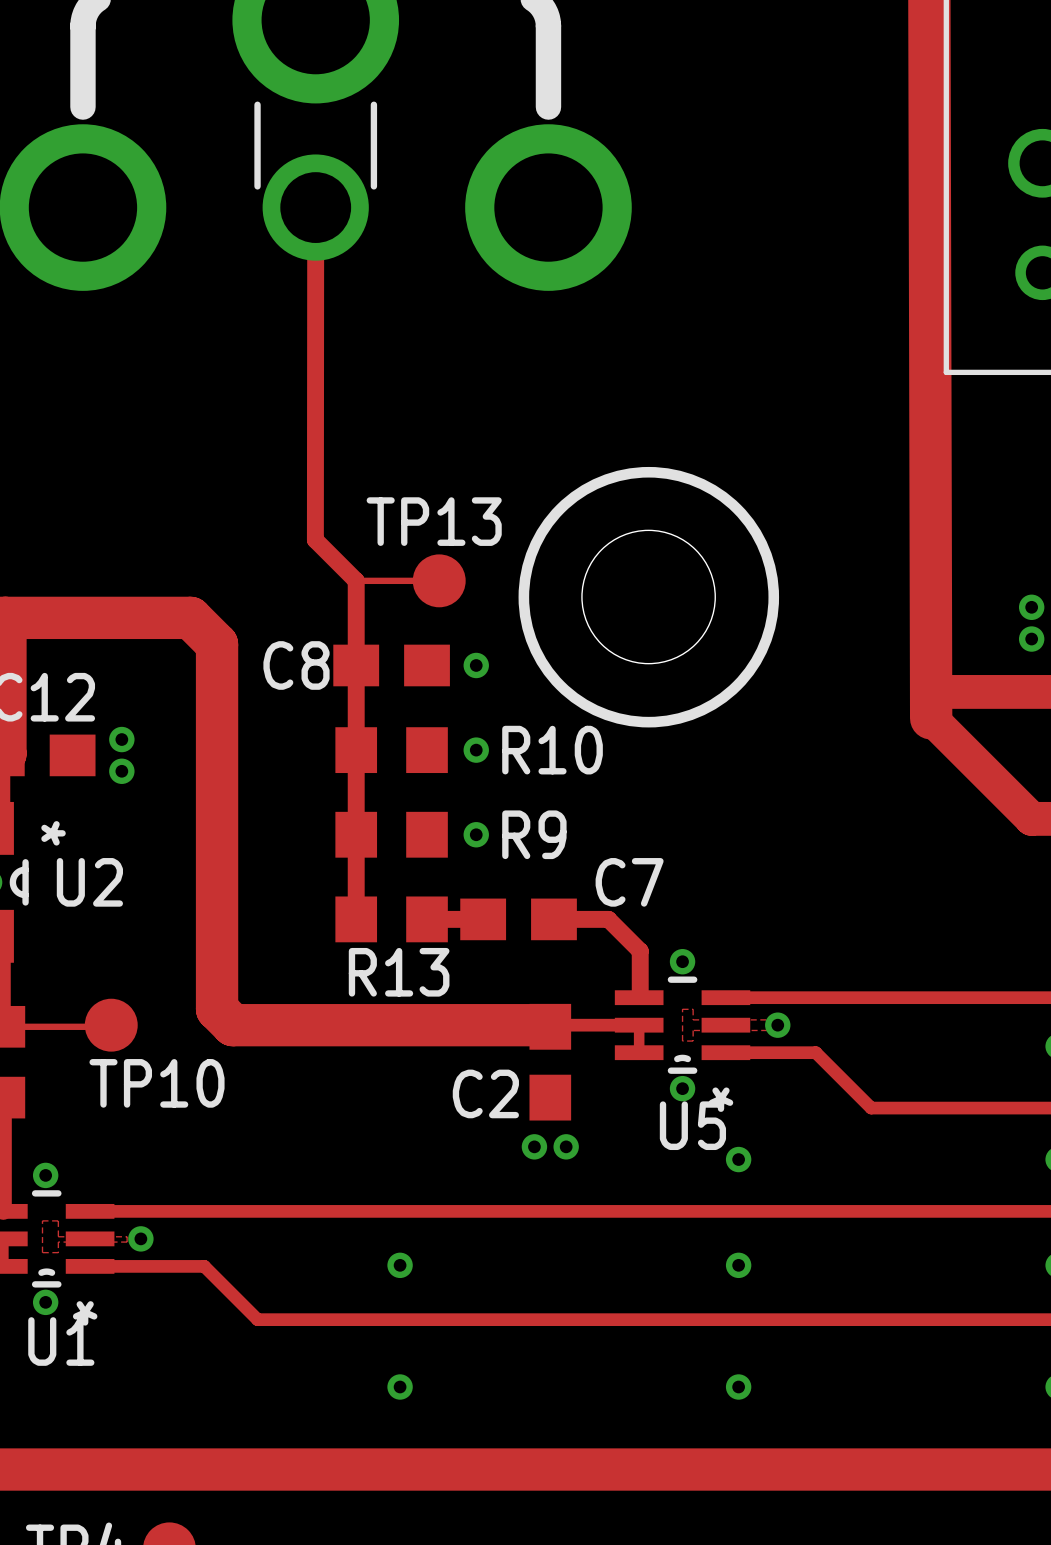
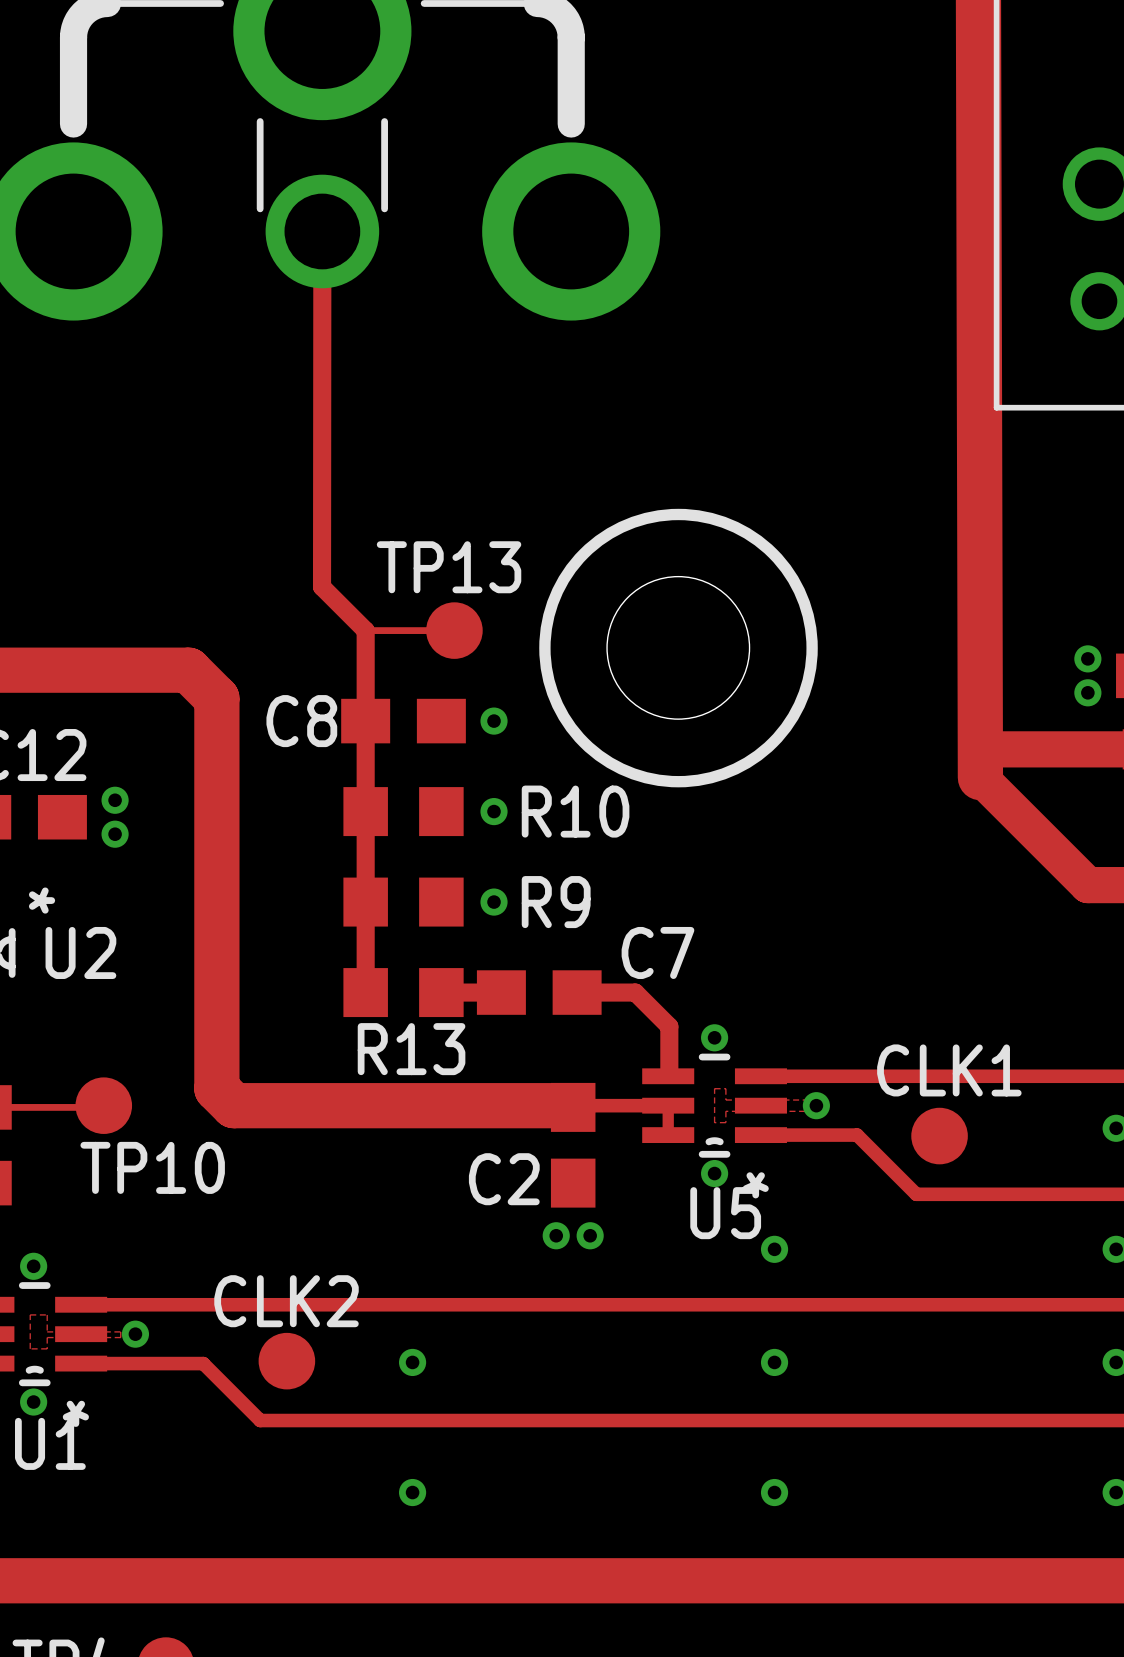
CLK1: none -> (939, 1136)
CLK2: none -> (286, 1361)

